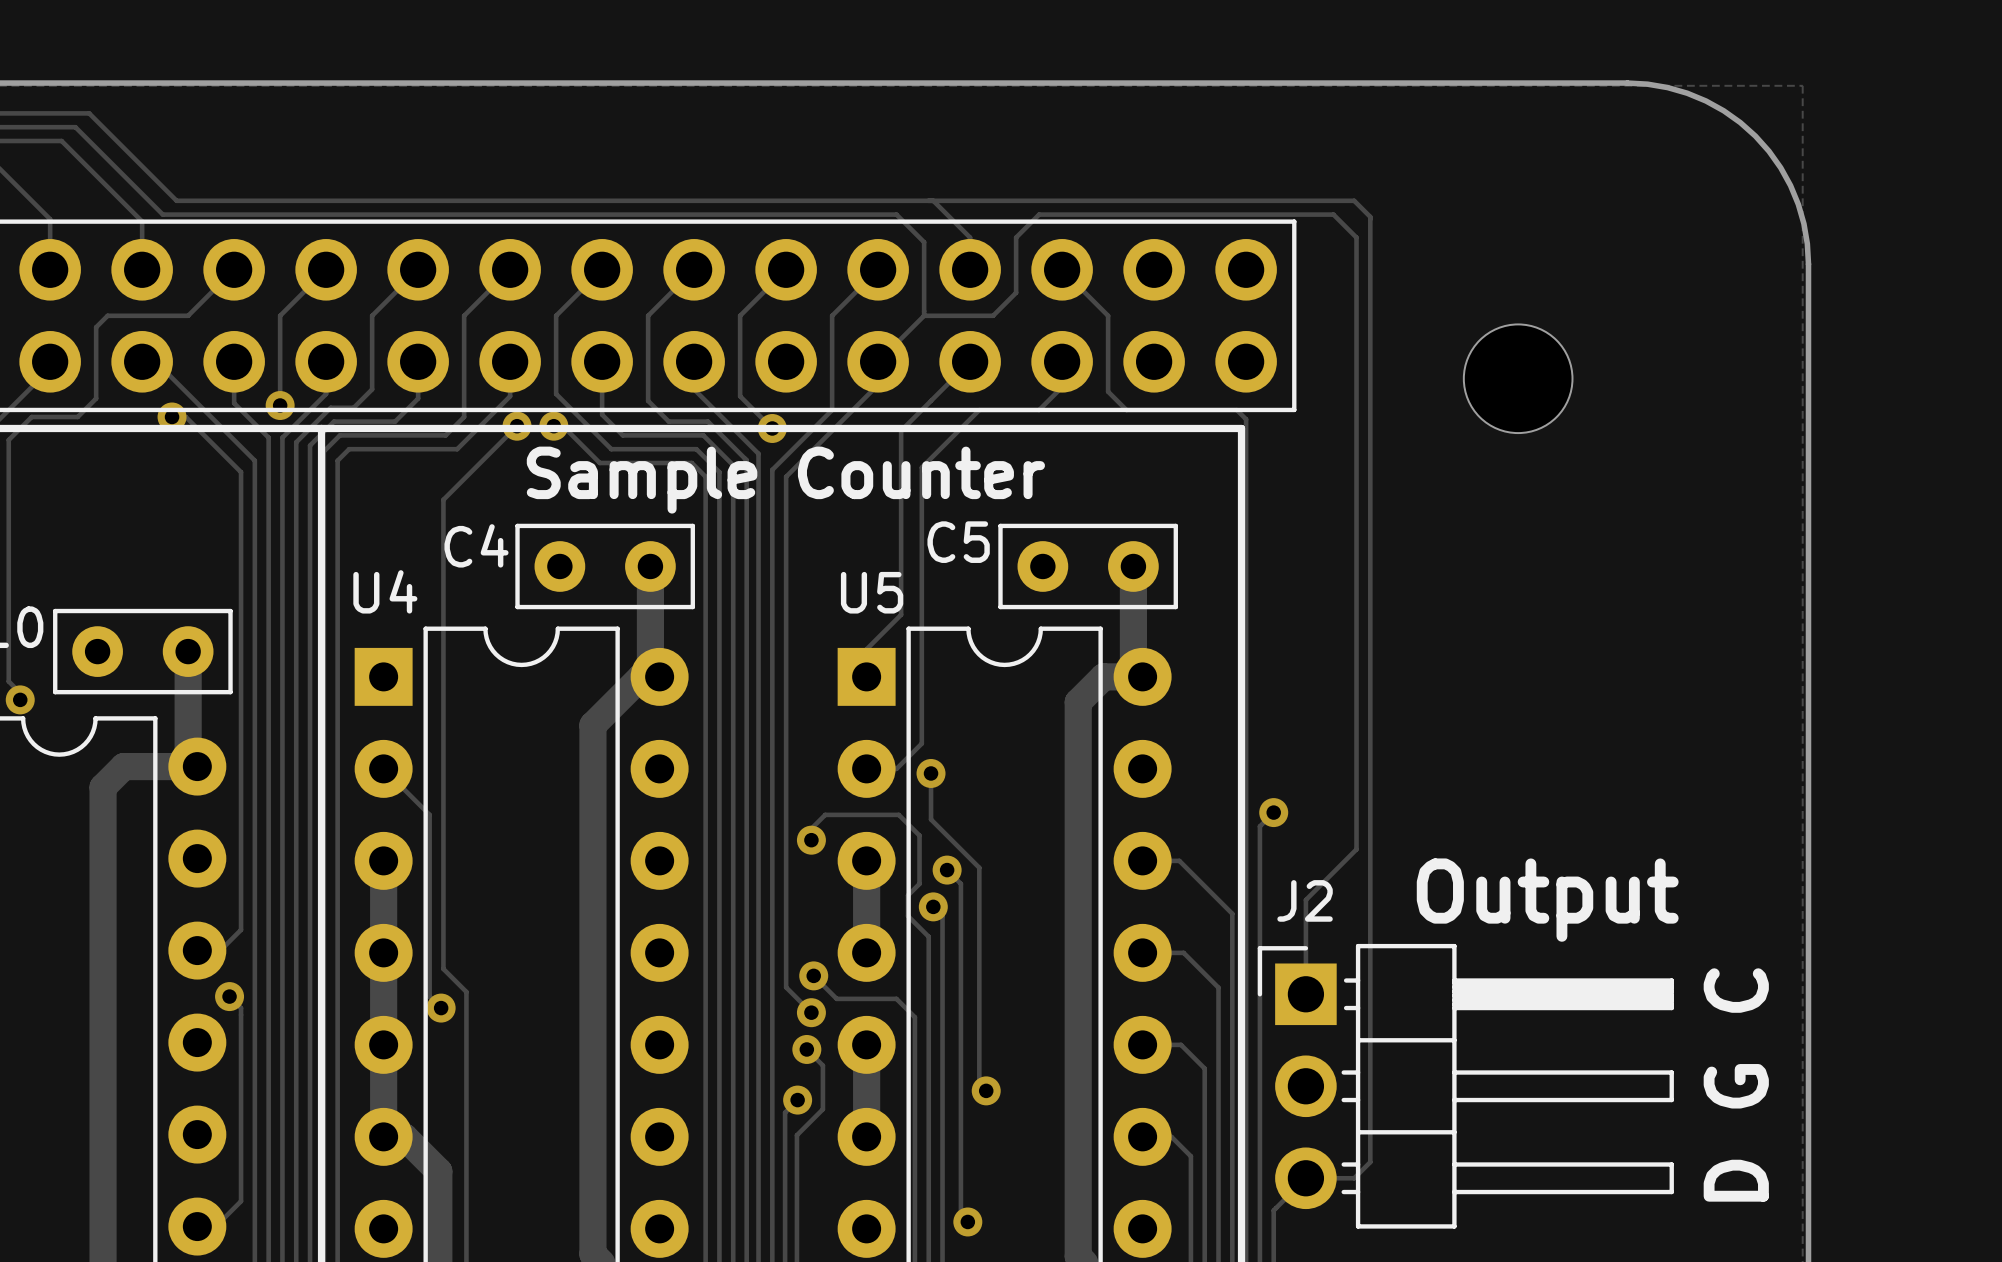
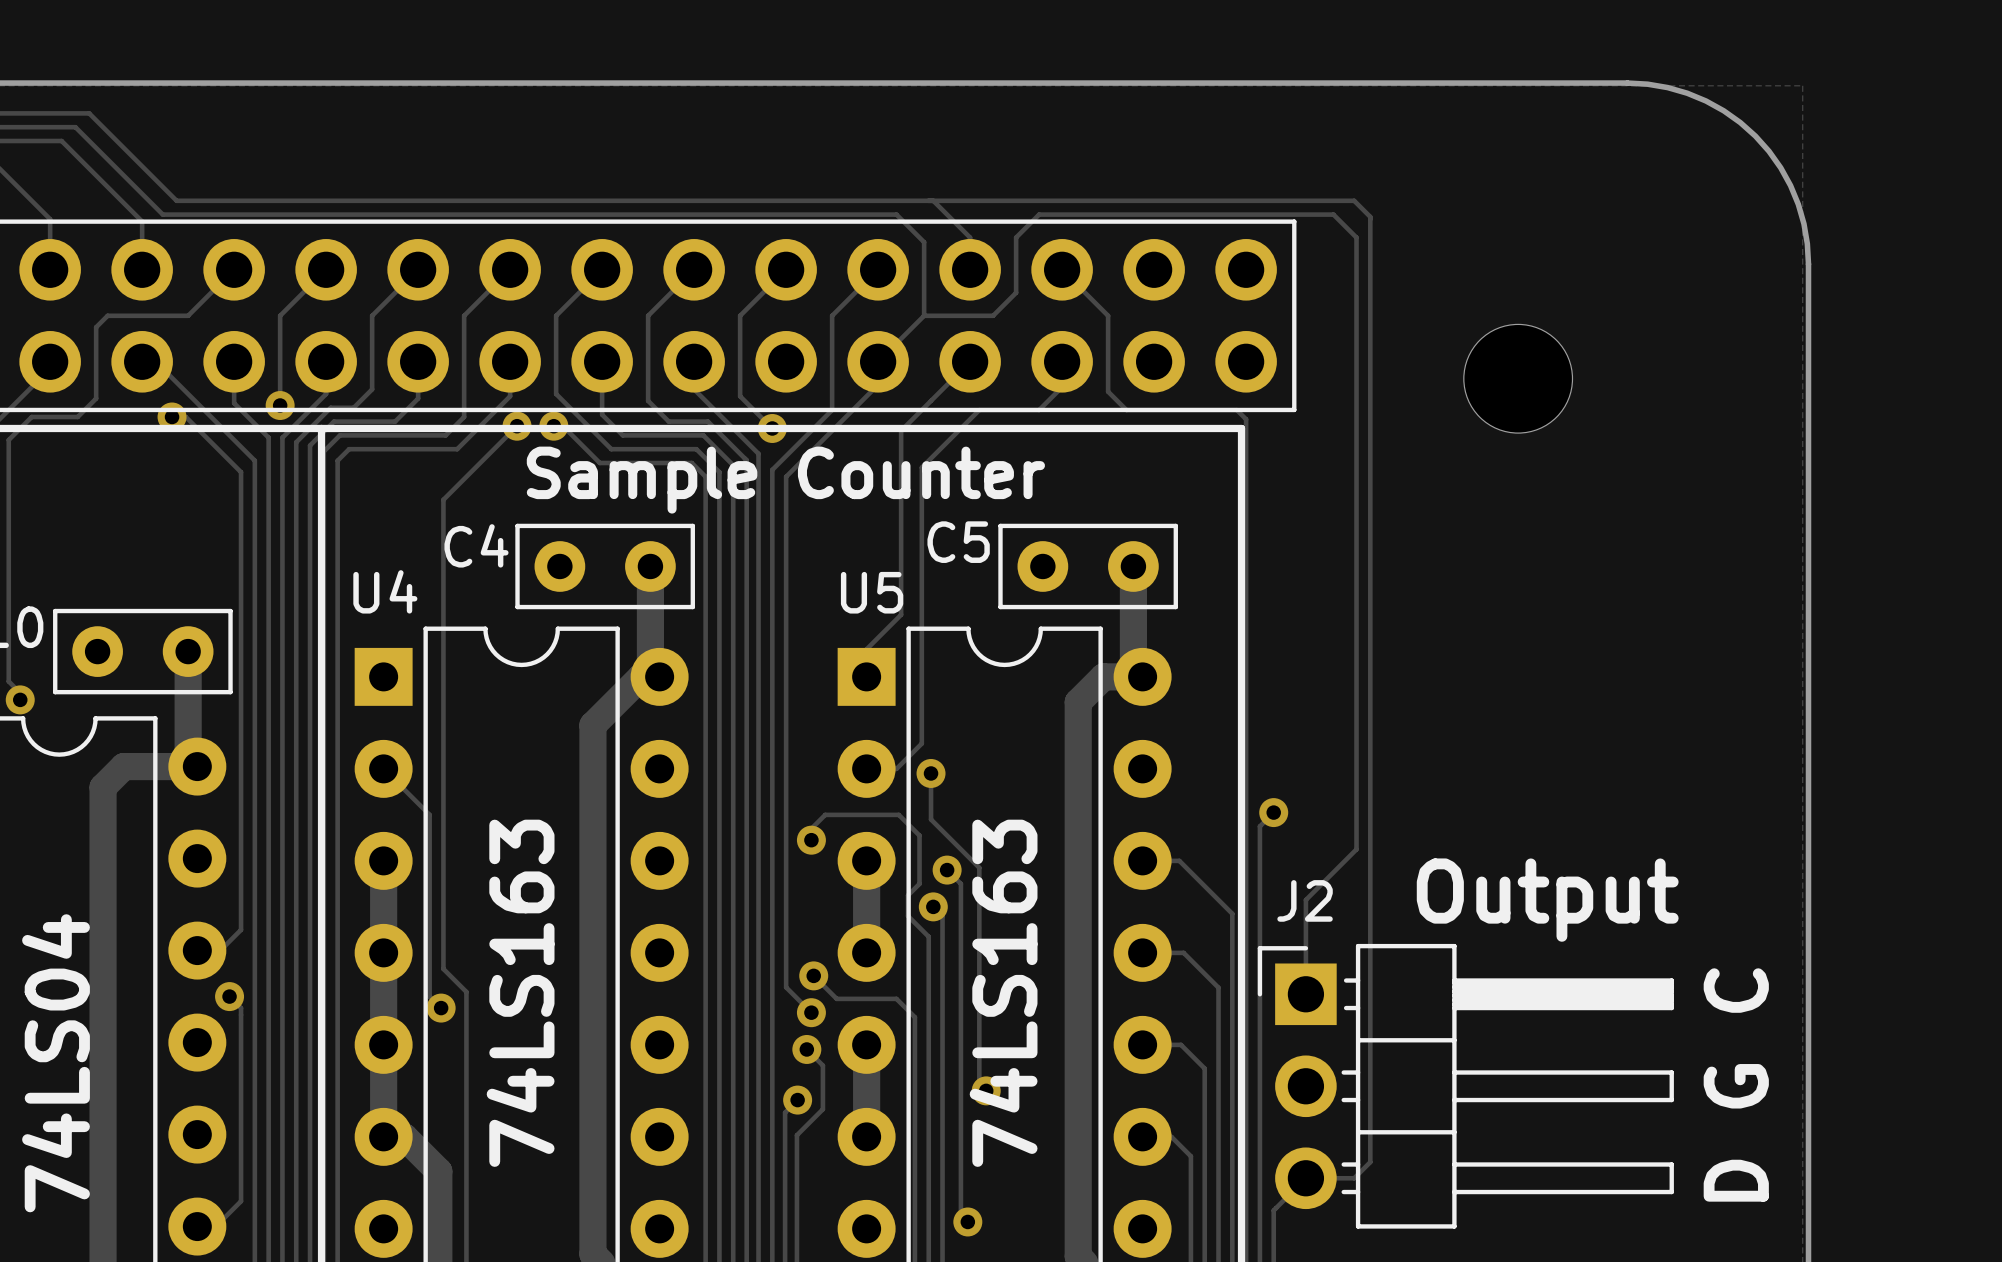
text: none -> 74LS163 (520, 993)
text: none -> 74LS163 (1003, 993)
text: none -> 74LS04 (56, 1063)

